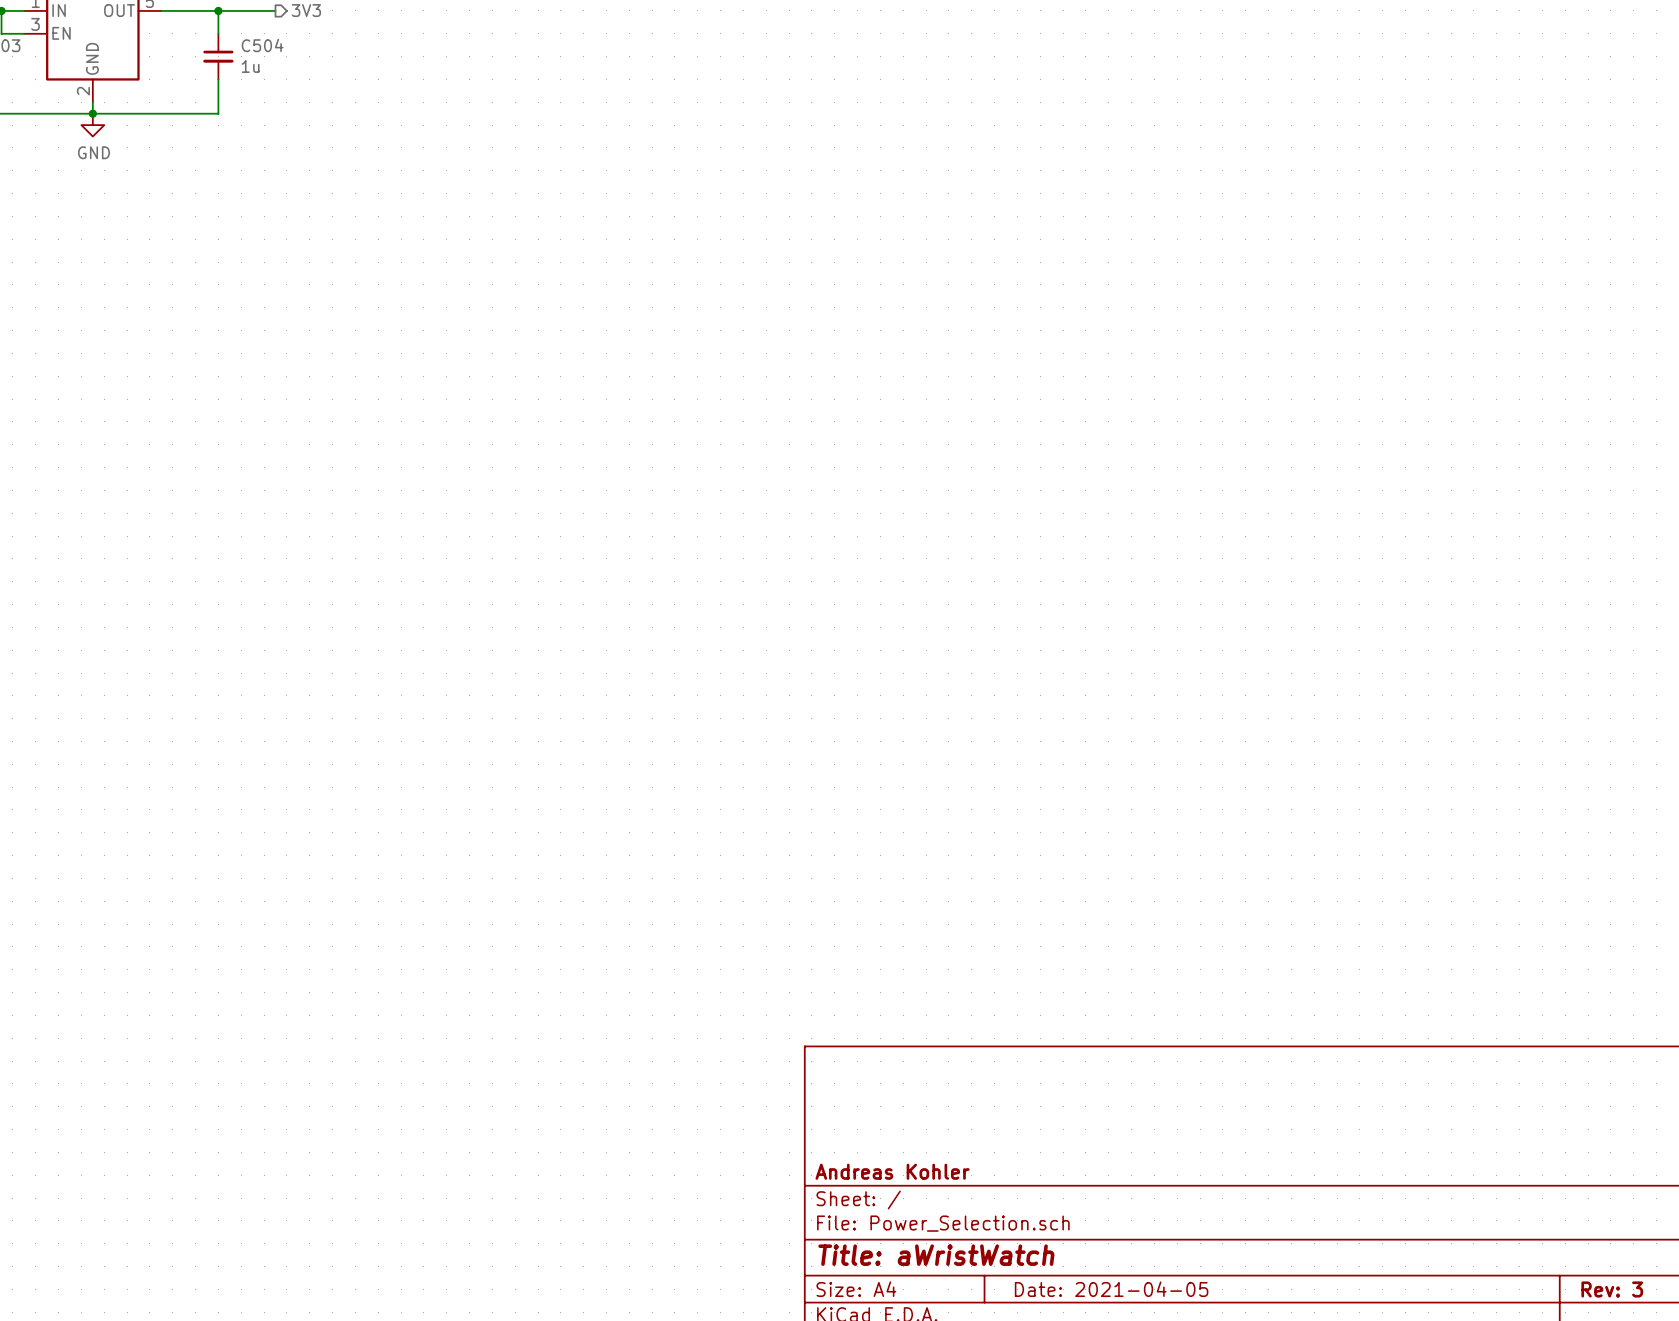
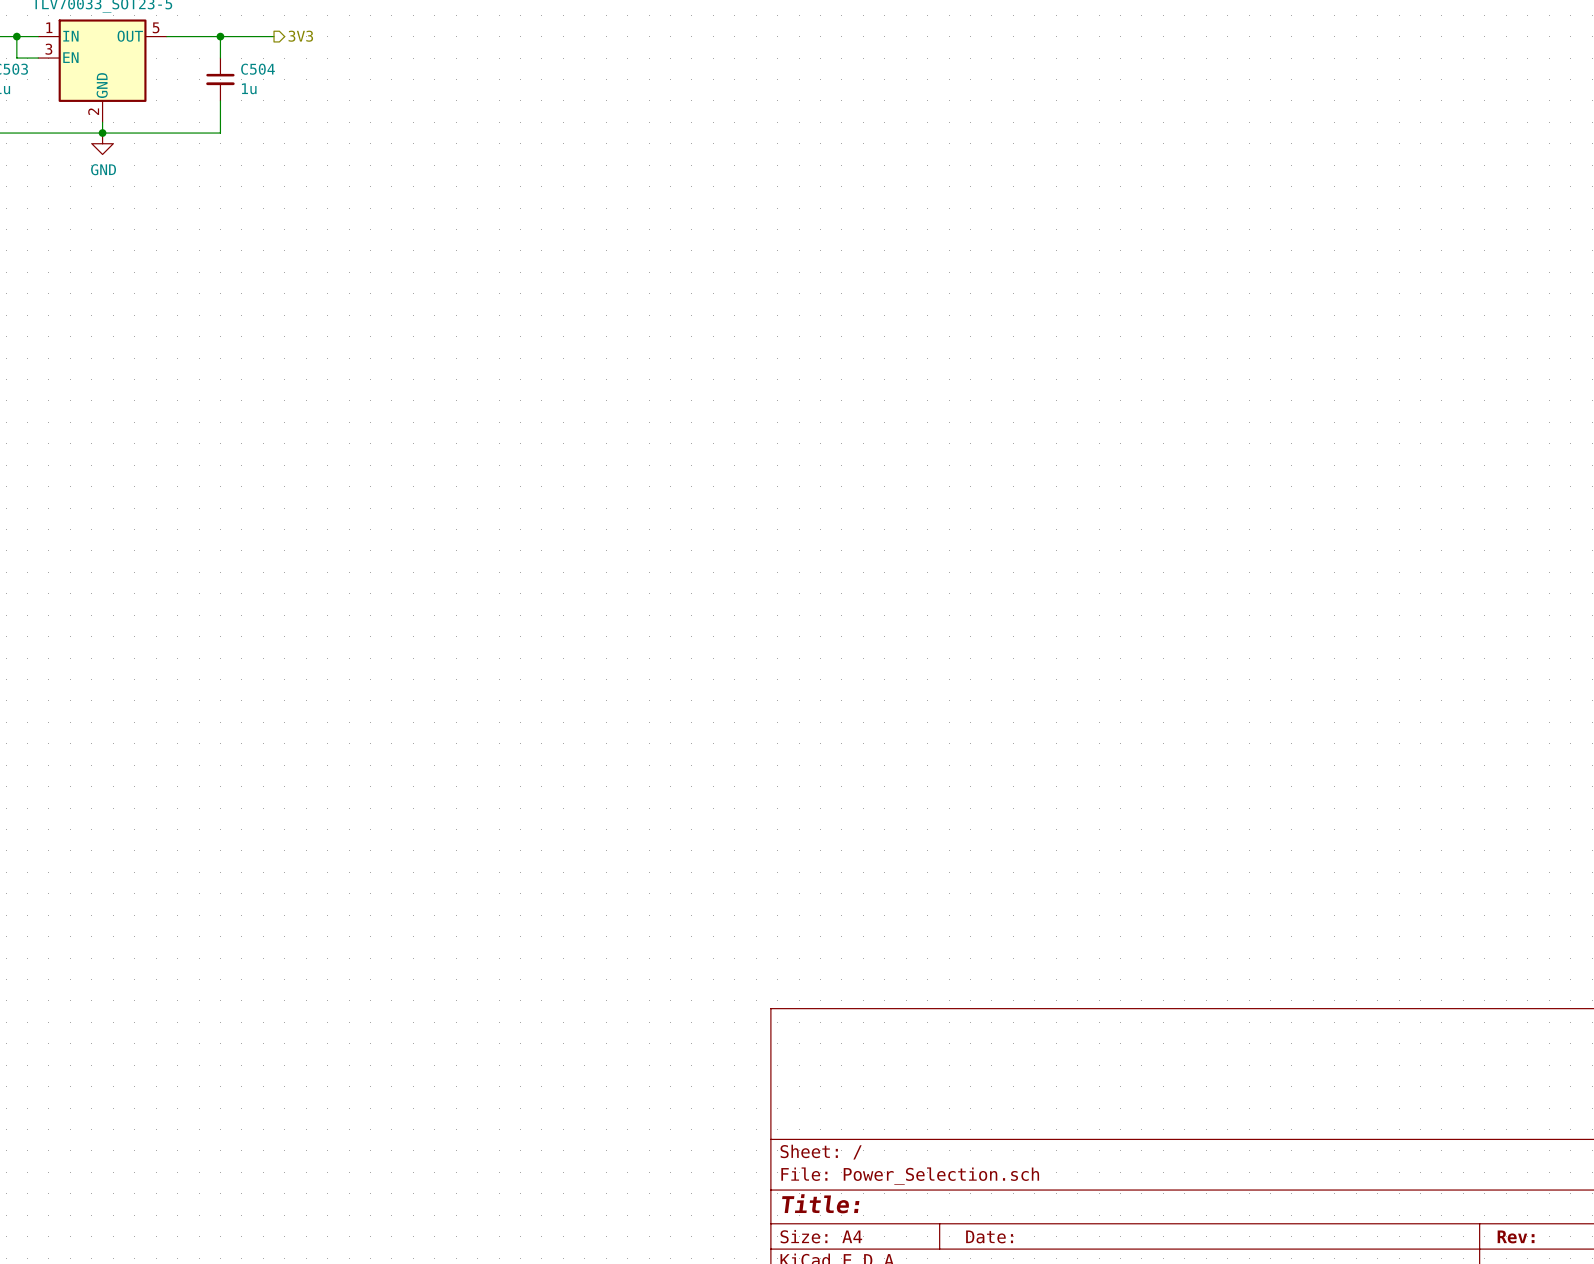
title block: Andreas Kohler (892, 1171) -> none
title block: Title: aWristWatch (936, 1255) -> Title: (820, 1203)
title block: Date: 2021-04-05 (1111, 1289) -> Date: (989, 1236)
title block: Rev: 3 (1612, 1289) -> Rev: (1516, 1236)

